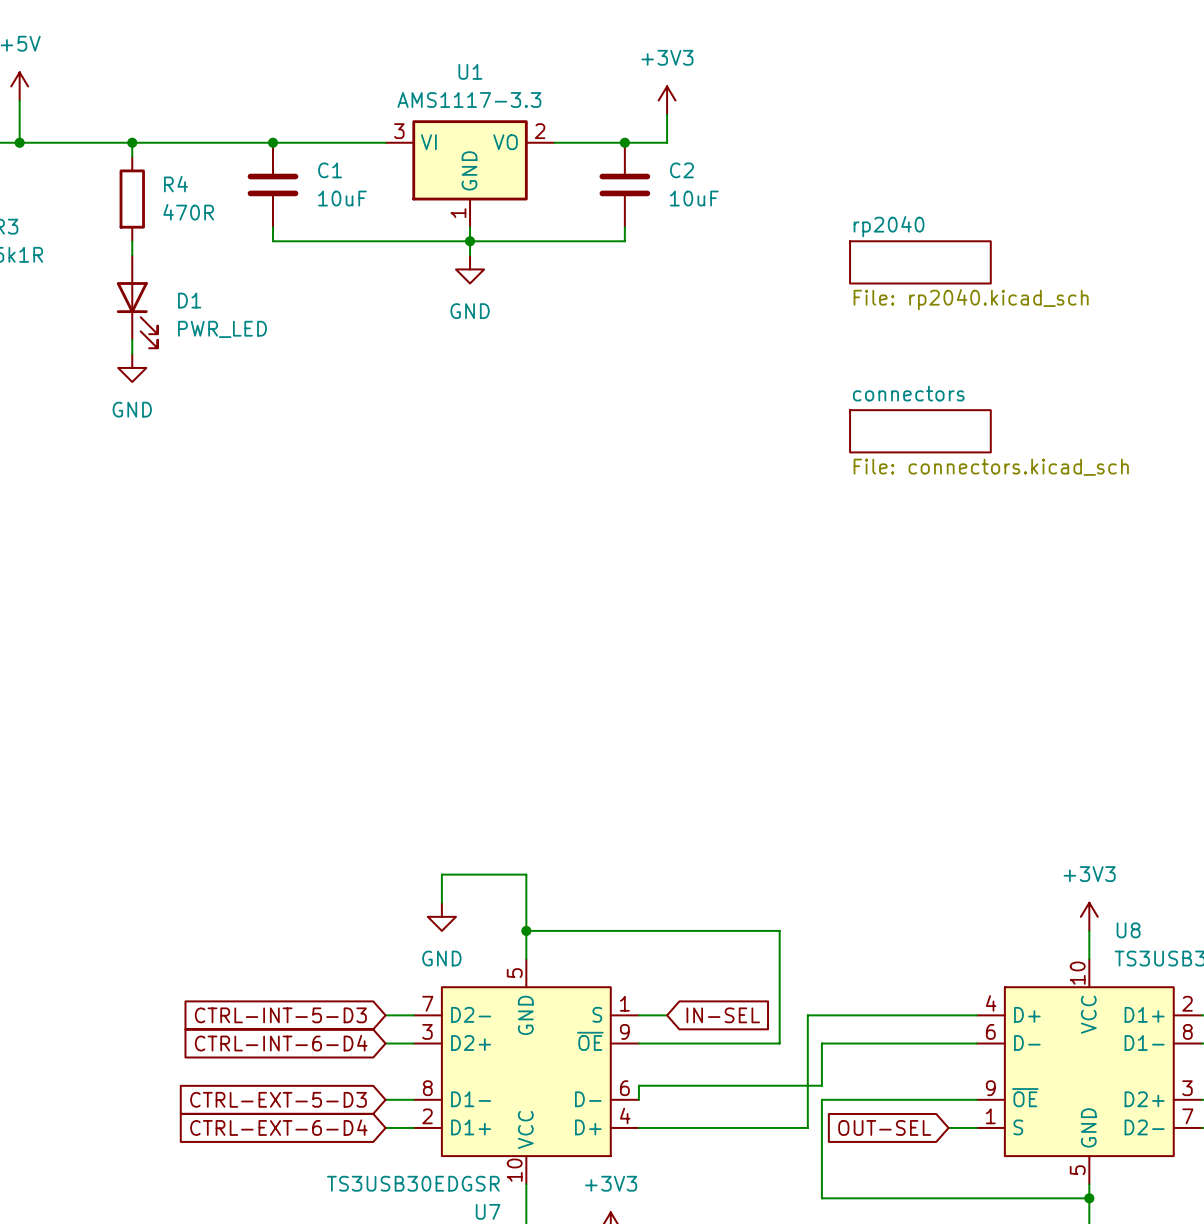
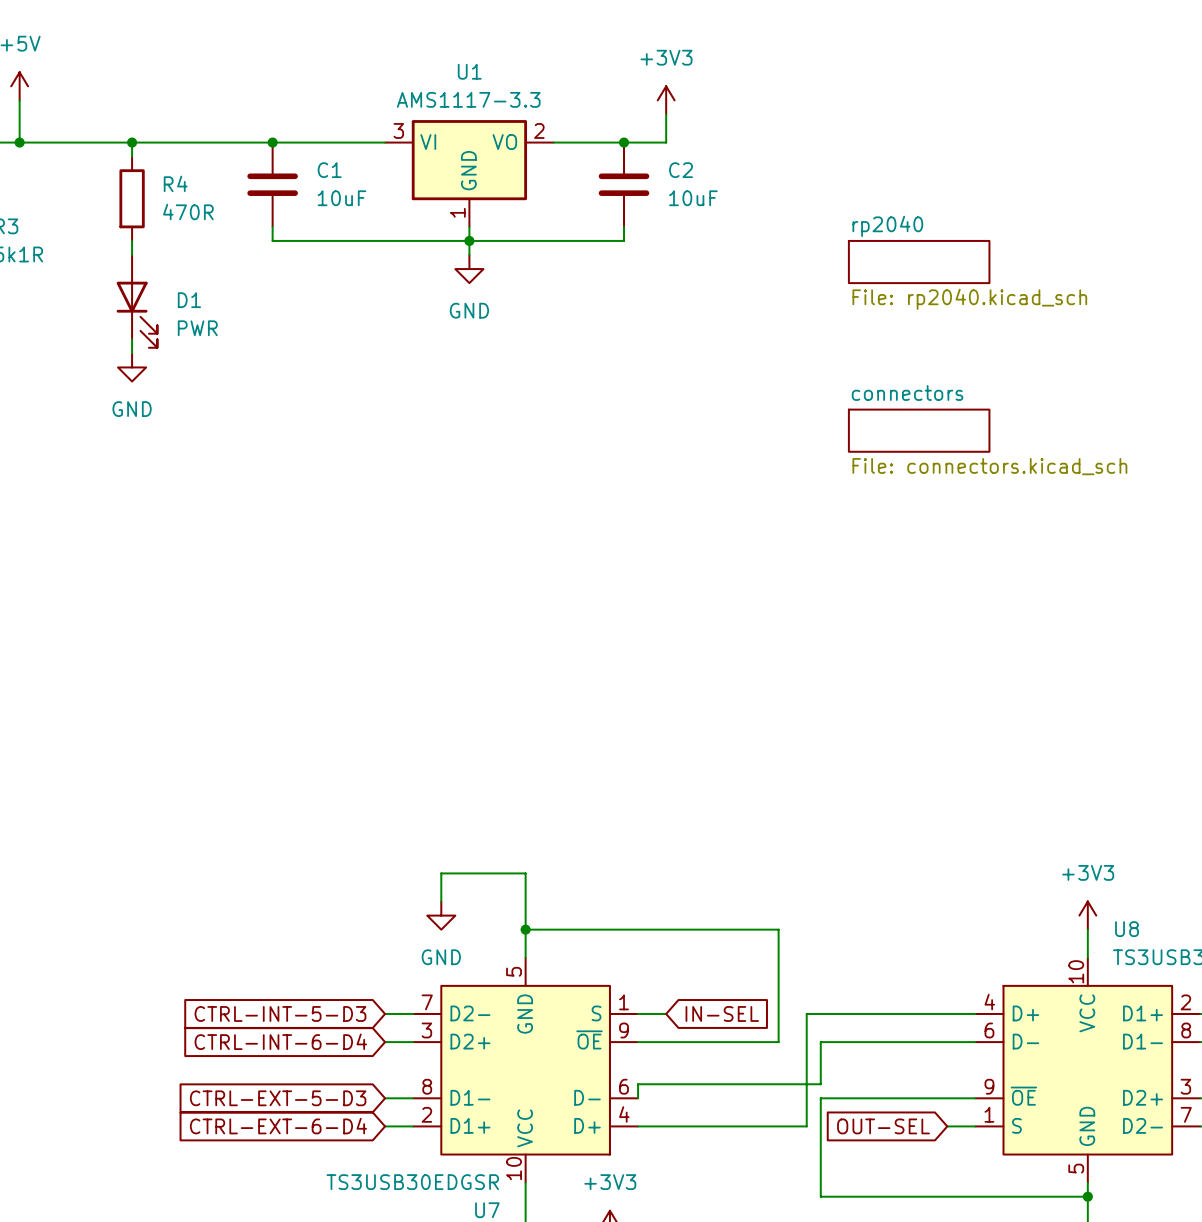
D1 value: PWR_LED (222, 329) -> PWR (197, 328)

